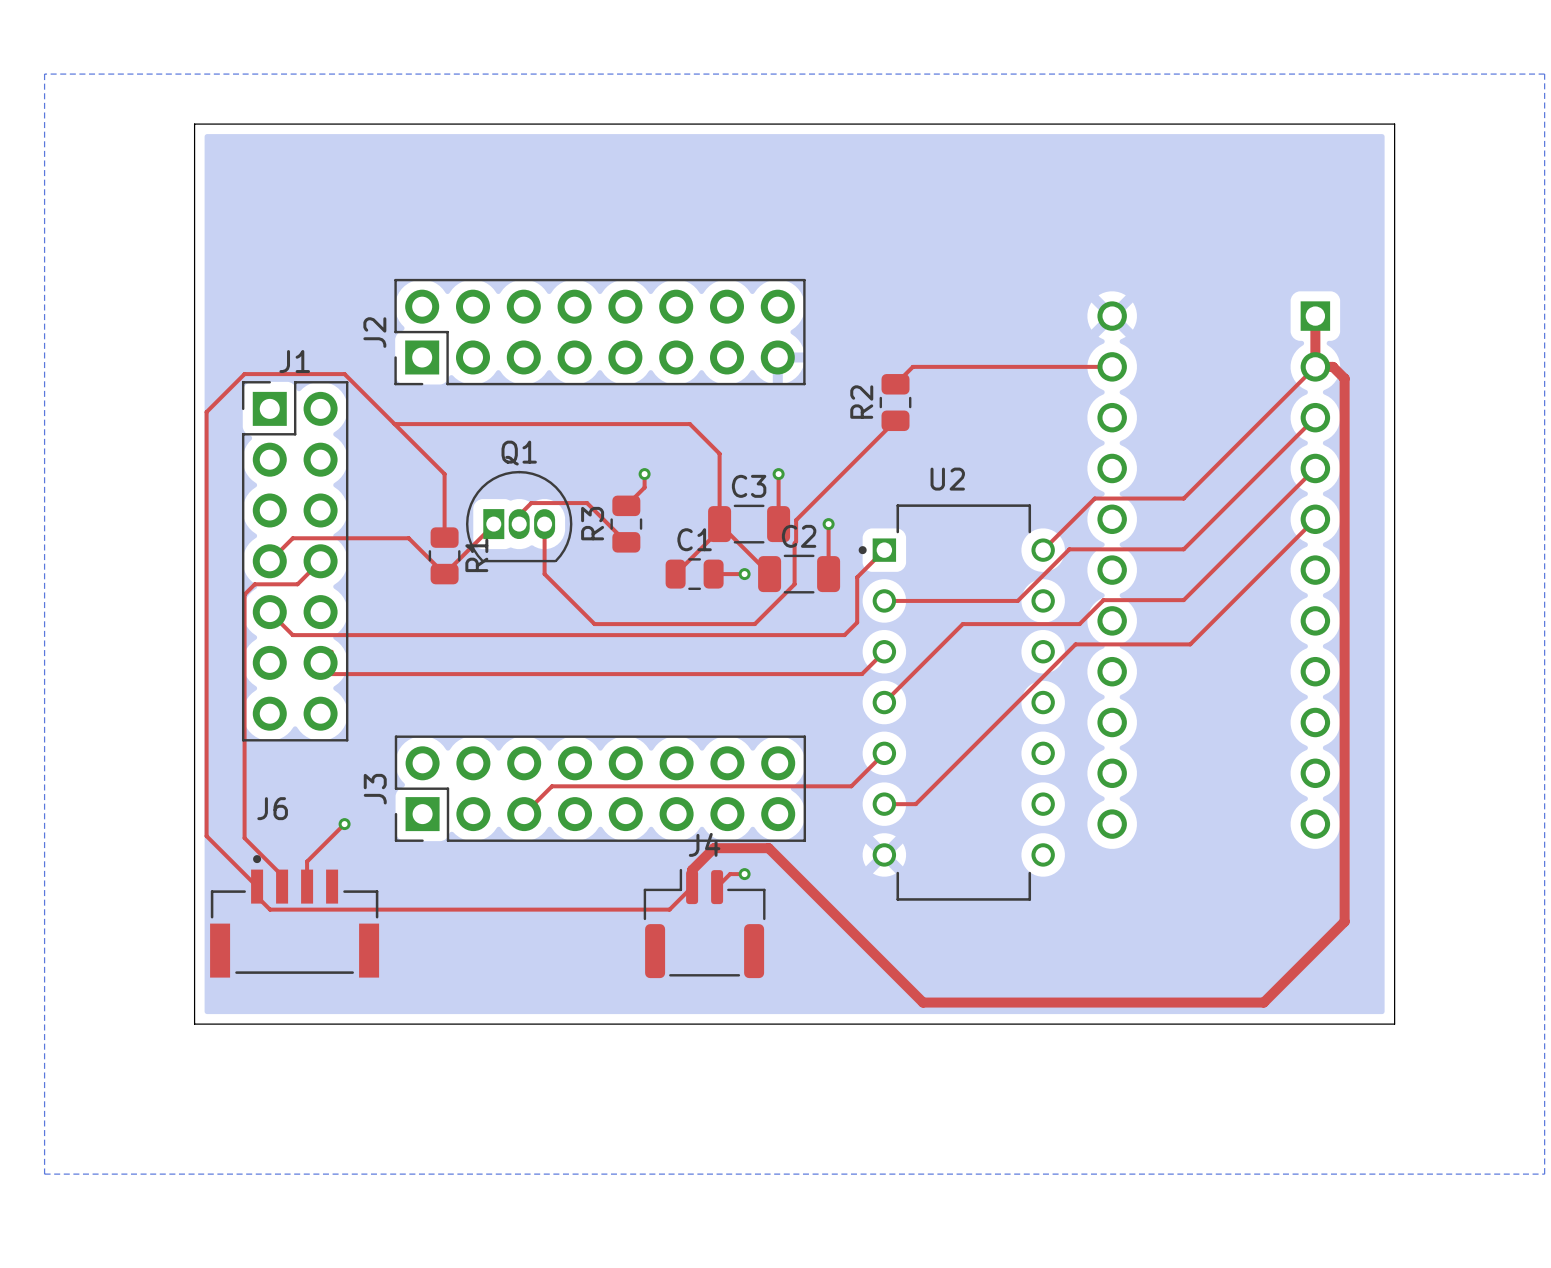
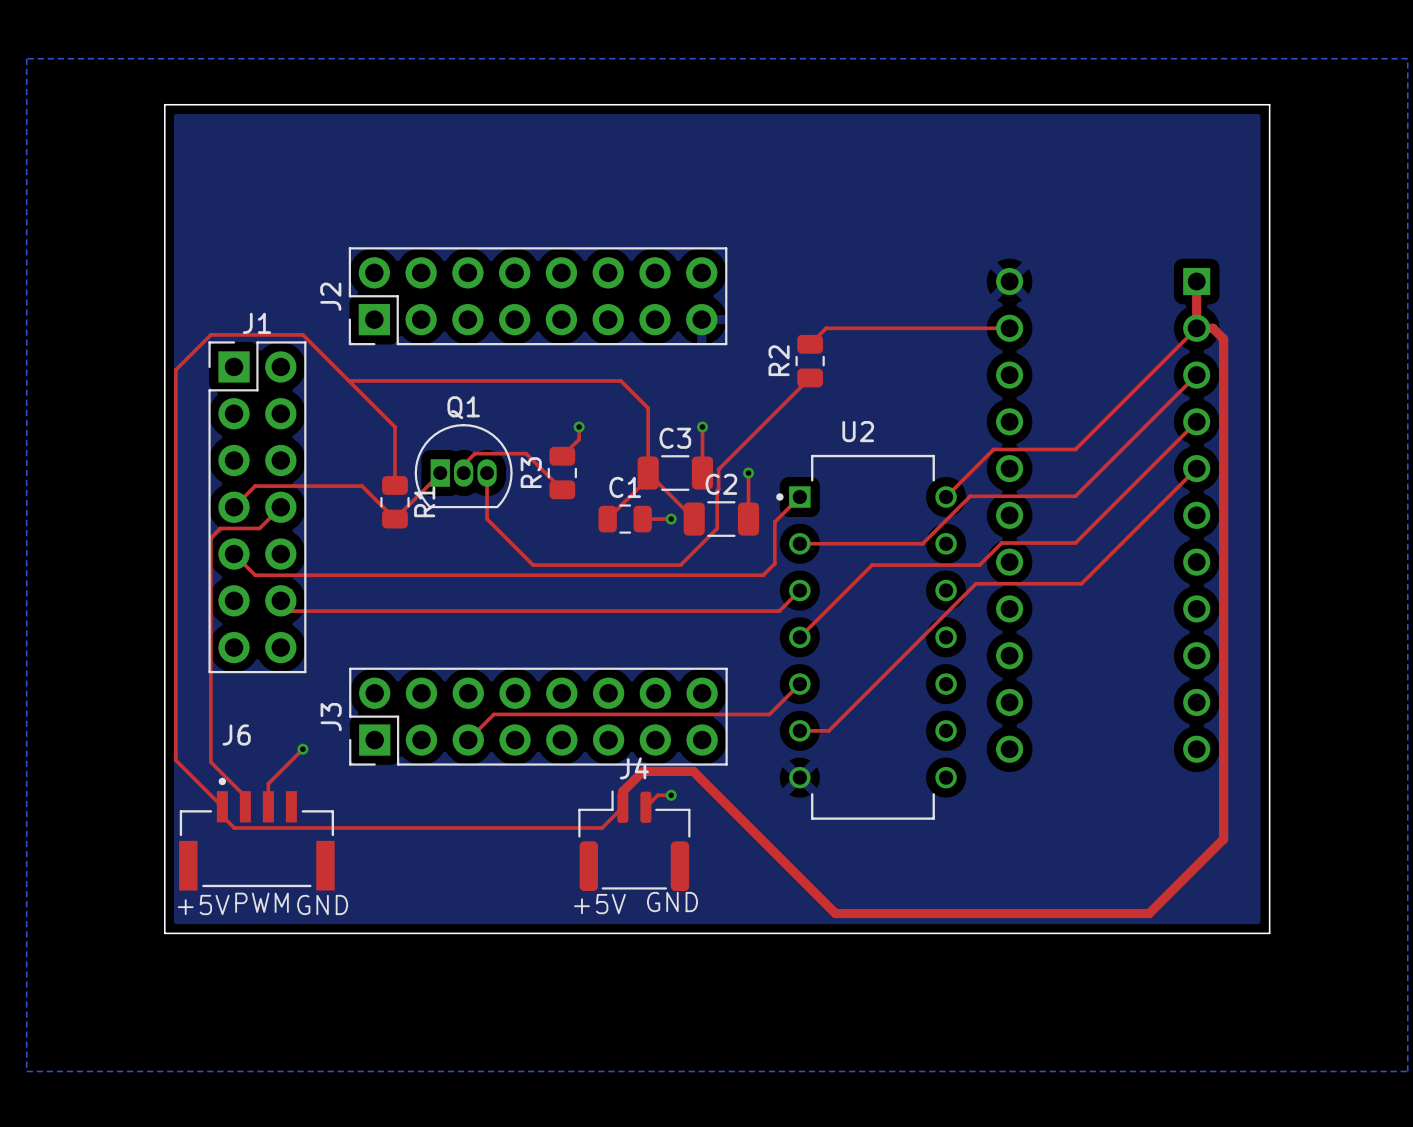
text: none -> PWM (262, 902)
text: none -> GND (672, 902)
text: none -> +5V (599, 904)
text: none -> +5V (203, 904)
text: none -> GND (322, 904)

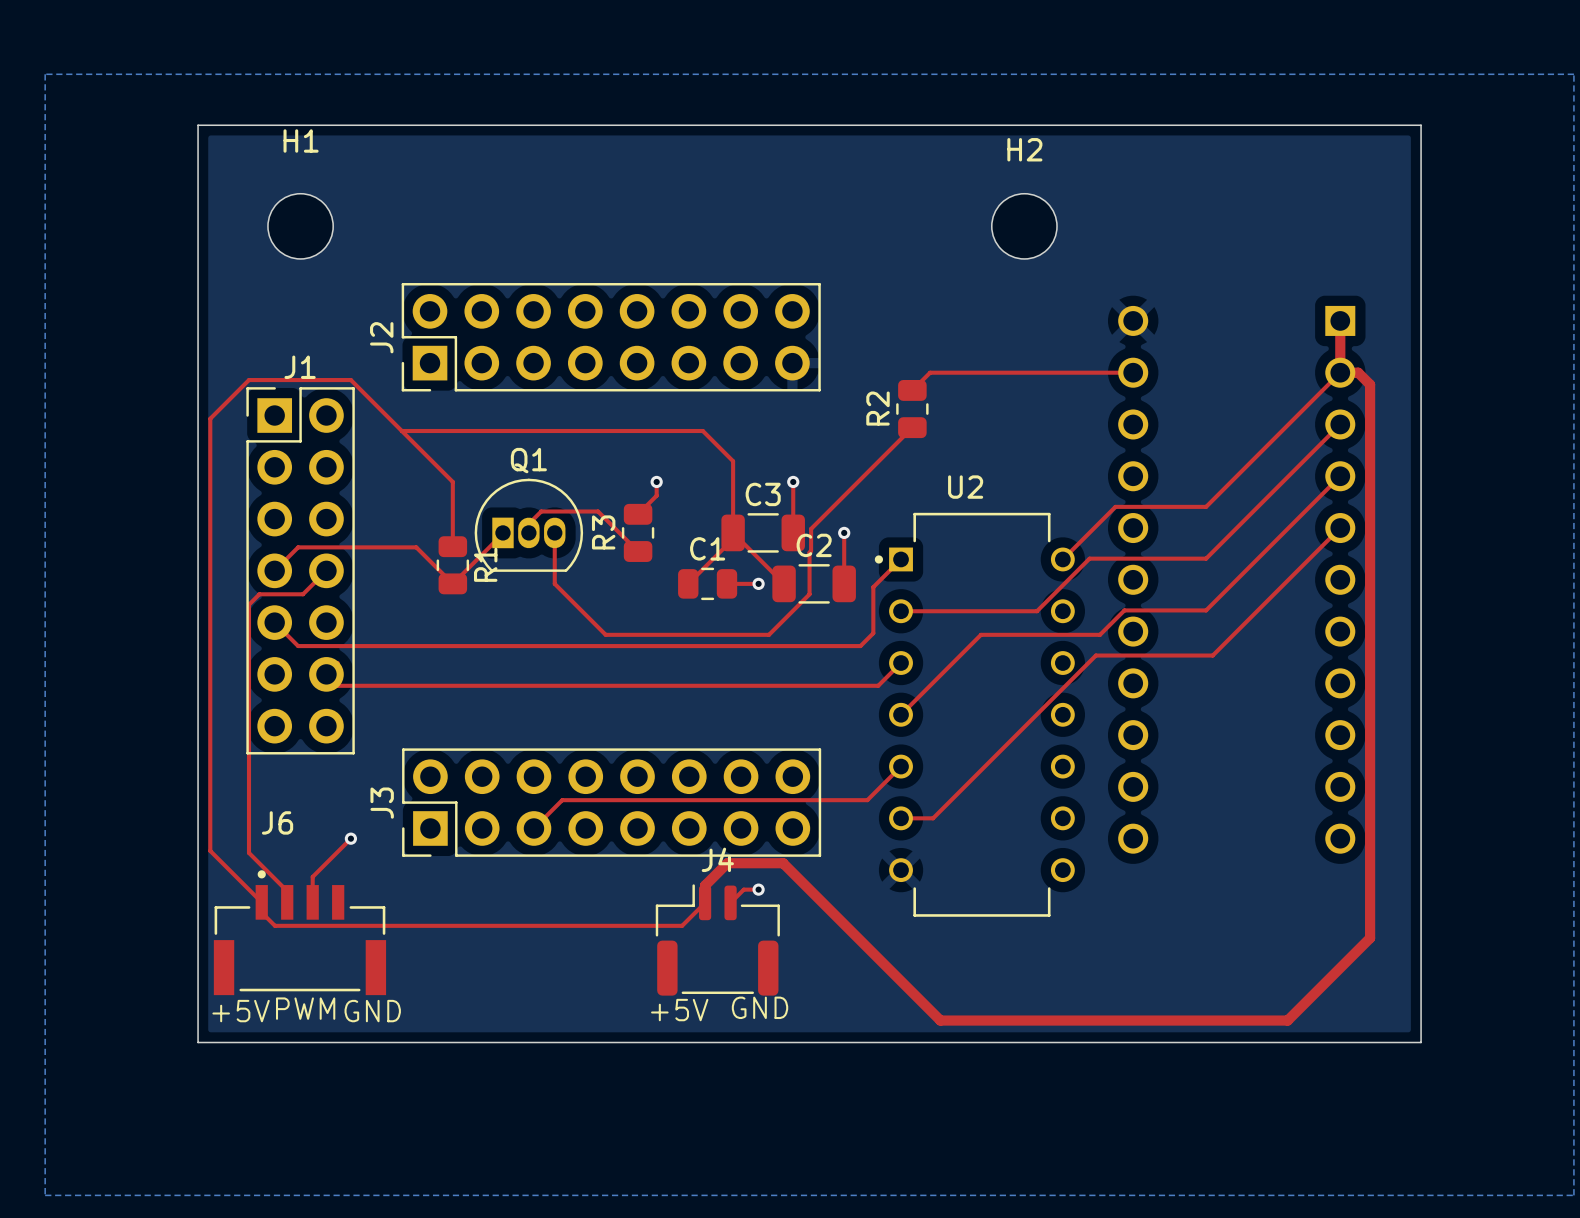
H1: none -> (300, 226)
H2: none -> (1024, 226)

